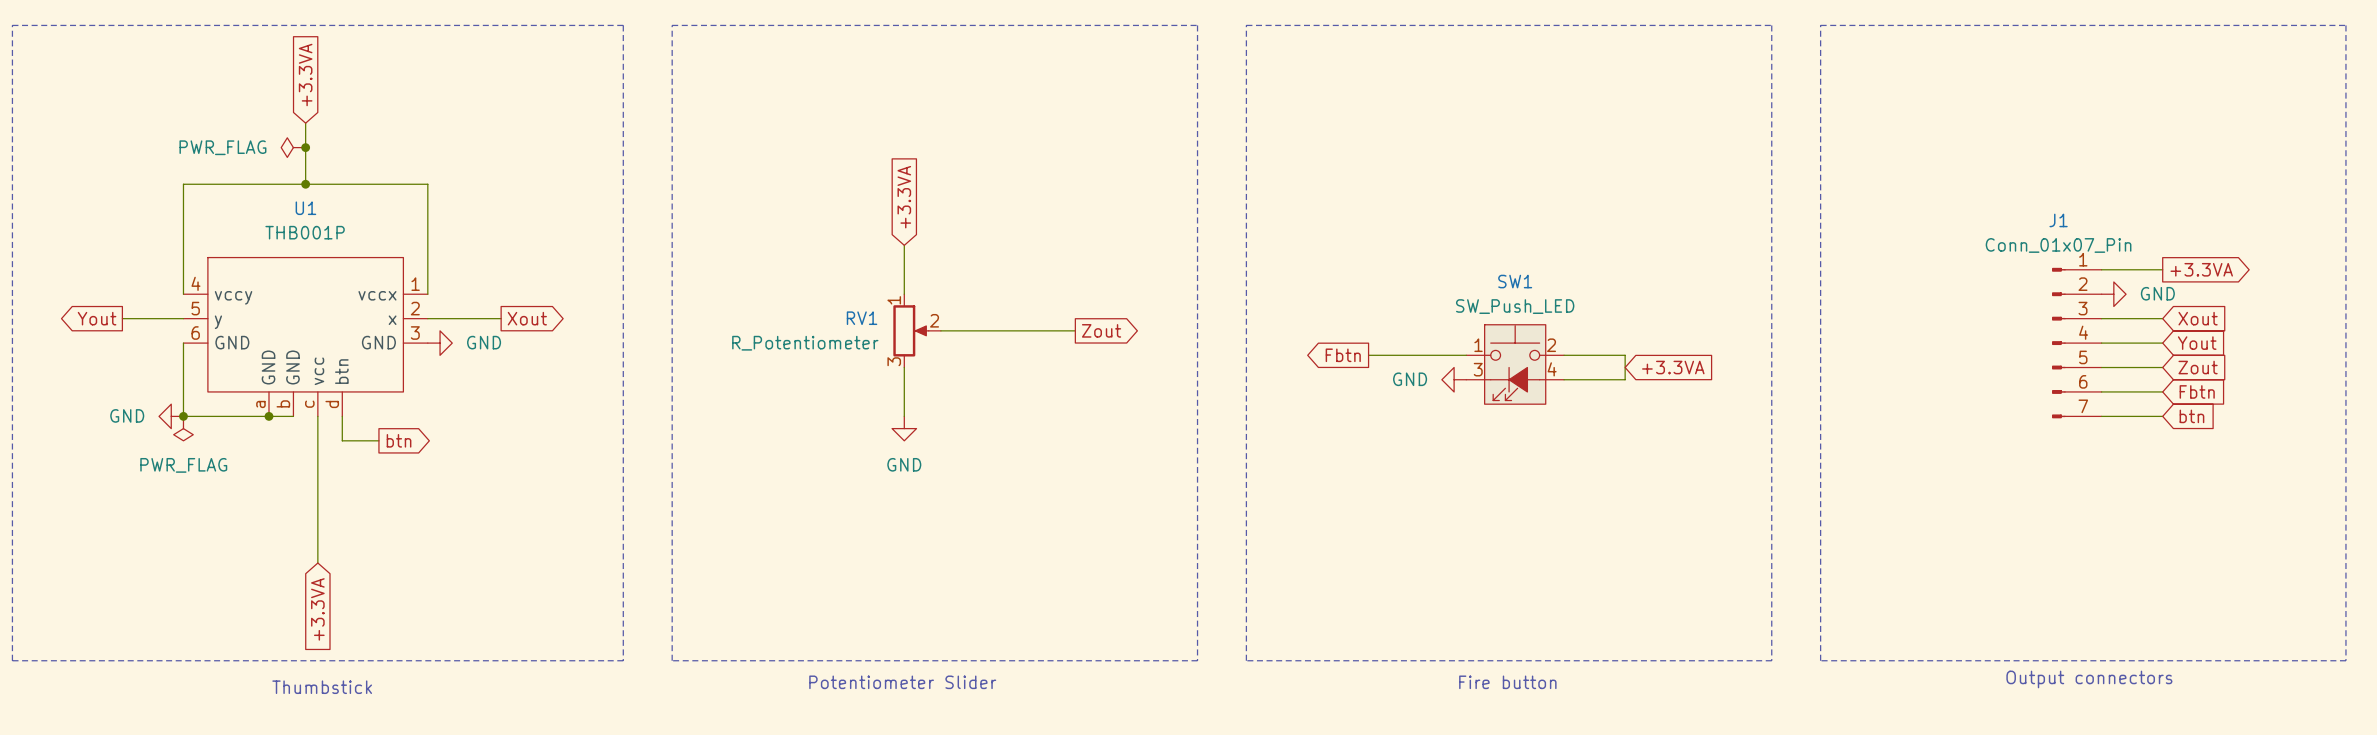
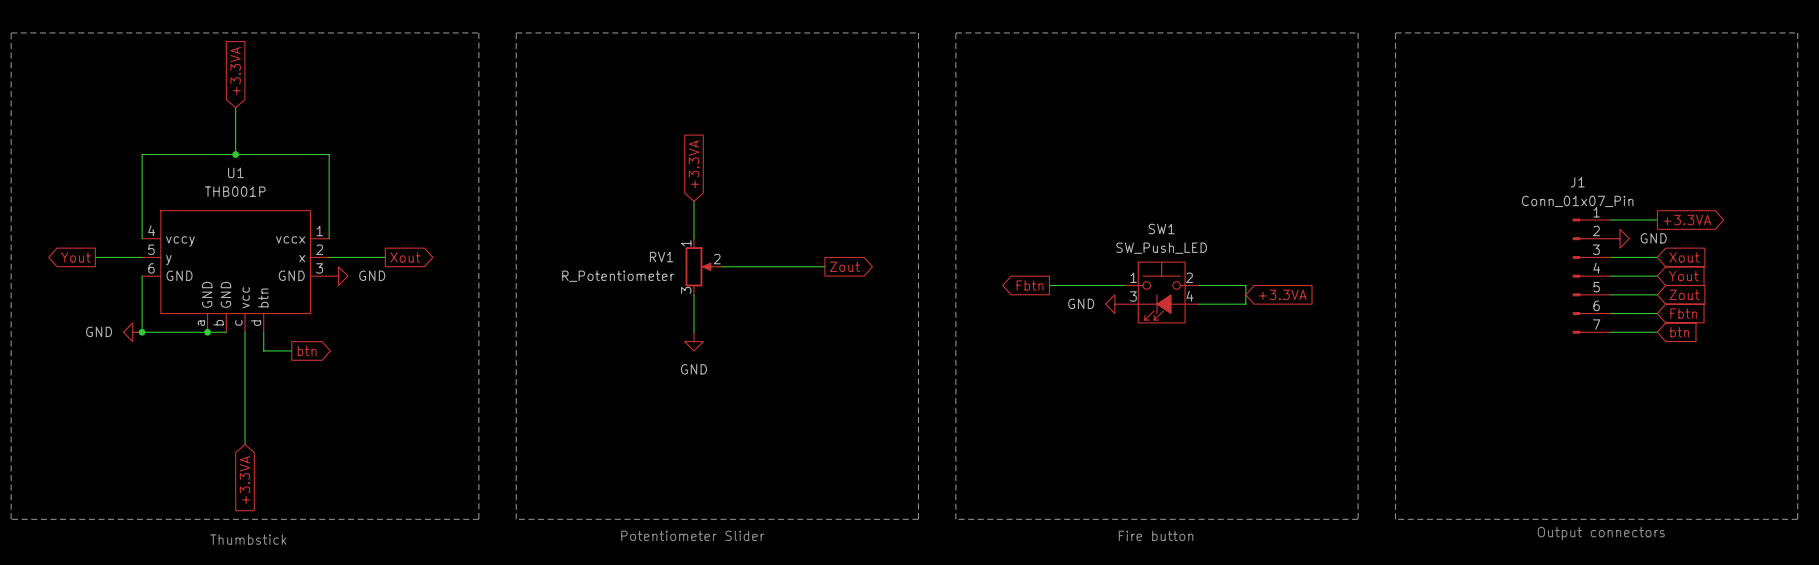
power symbol: PWR_FLAG (293, 147) -> none
junction: (305, 147) -> none
power symbol: PWR_FLAG (183, 428) -> none

